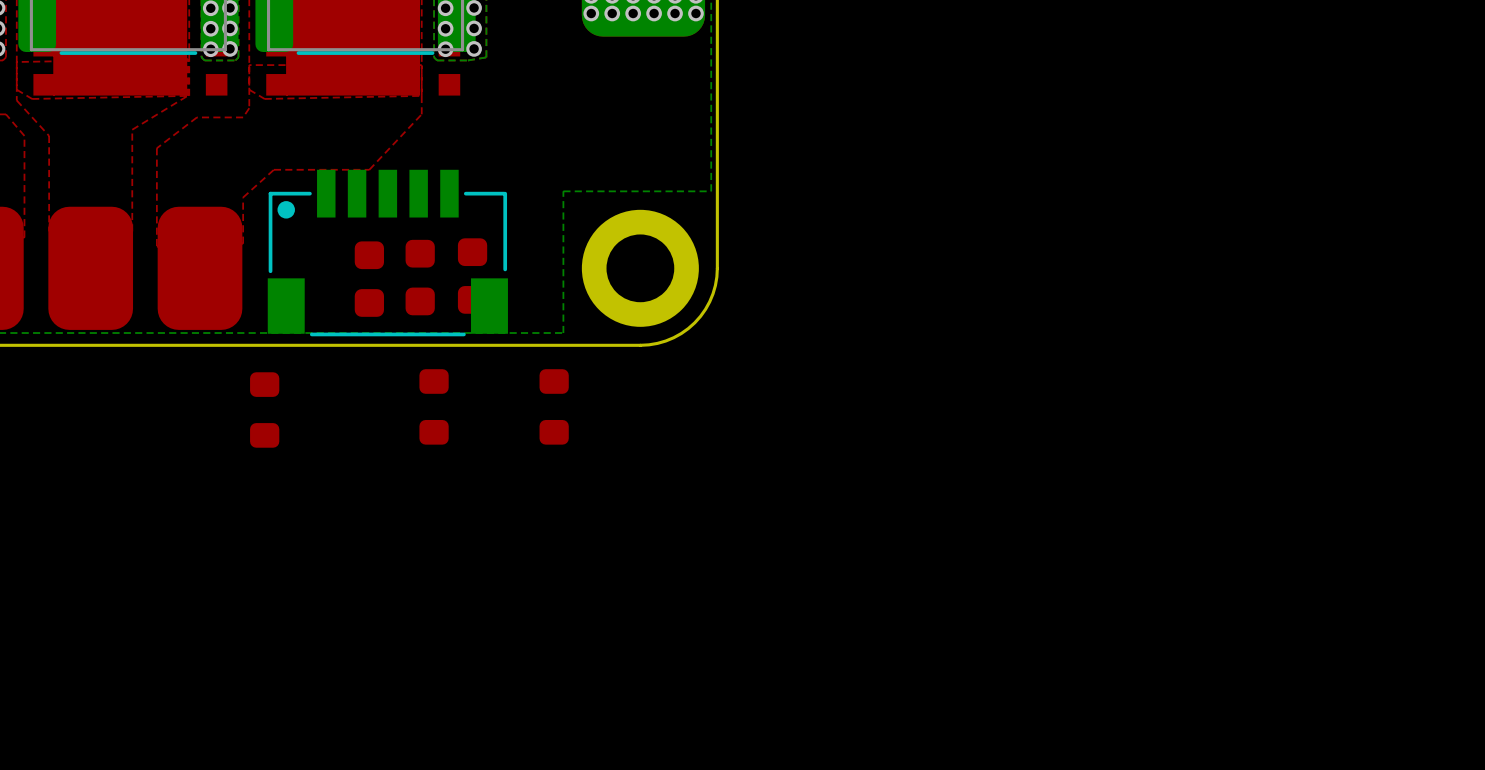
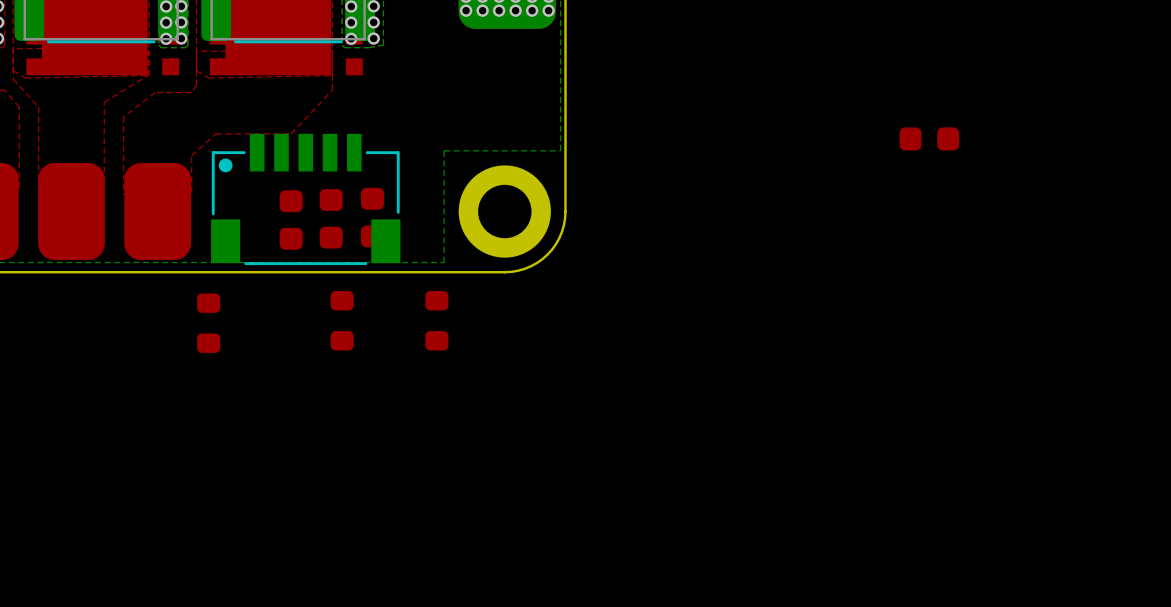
part: none -> (929, 138)

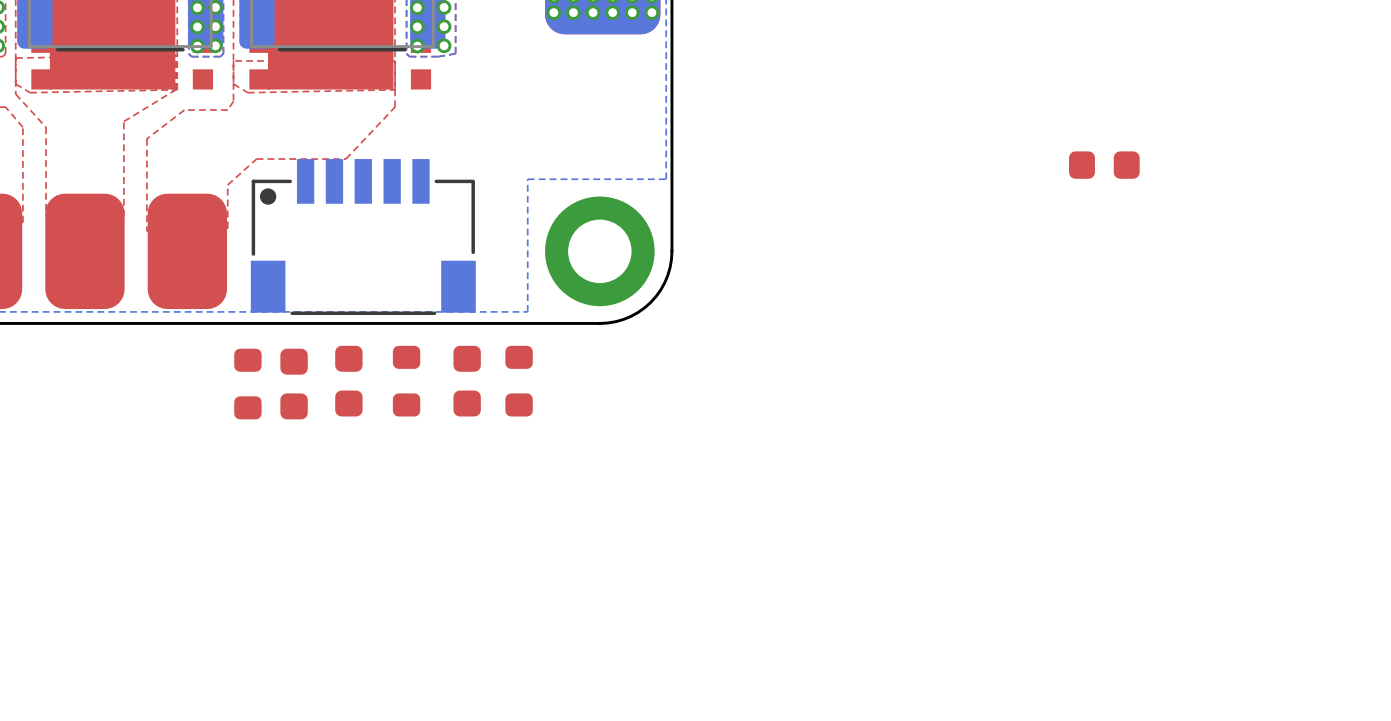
part: (372, 217) -> none
part: (331, 218) -> none
part: (291, 220) -> none
part: none -> (348, 381)
part: none -> (467, 381)
part: none -> (294, 384)

